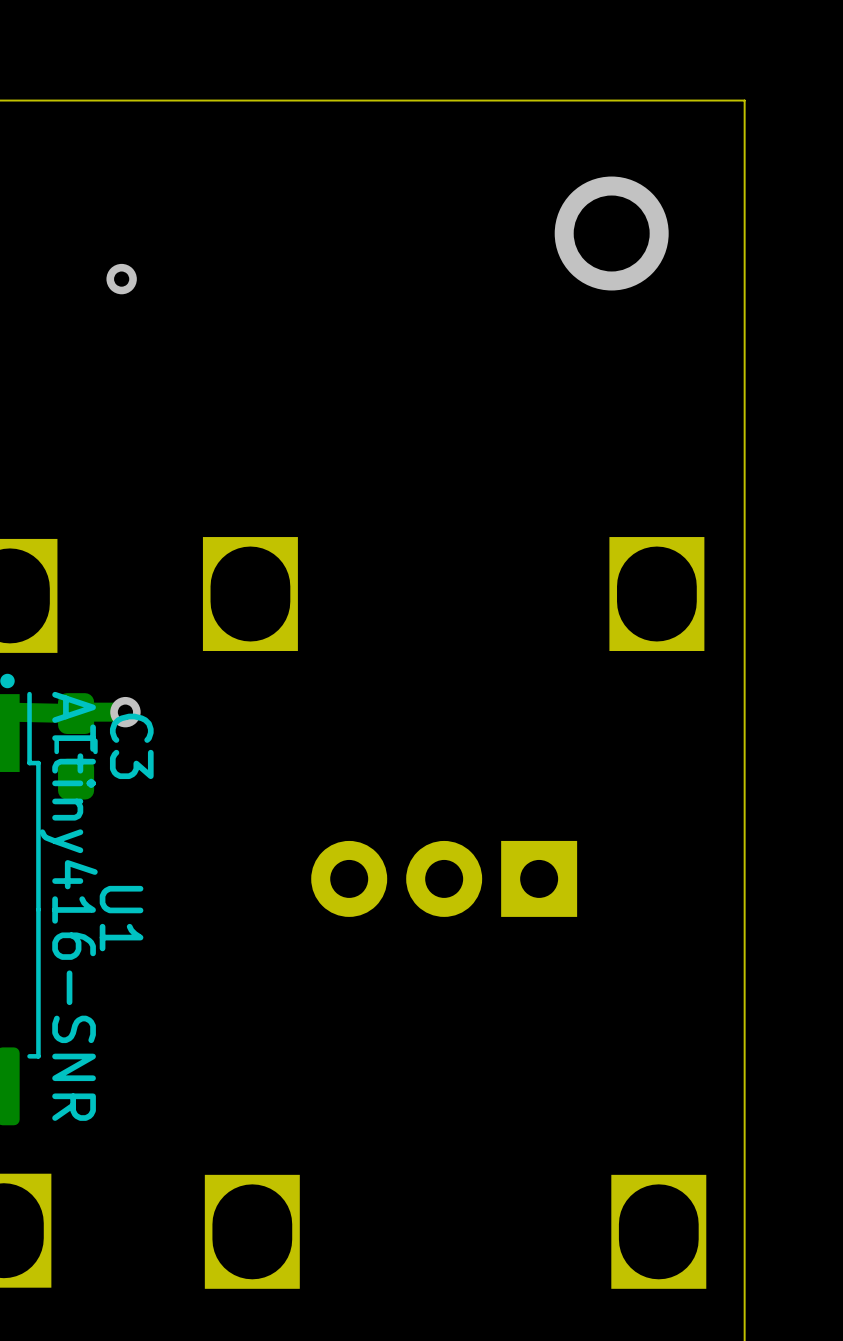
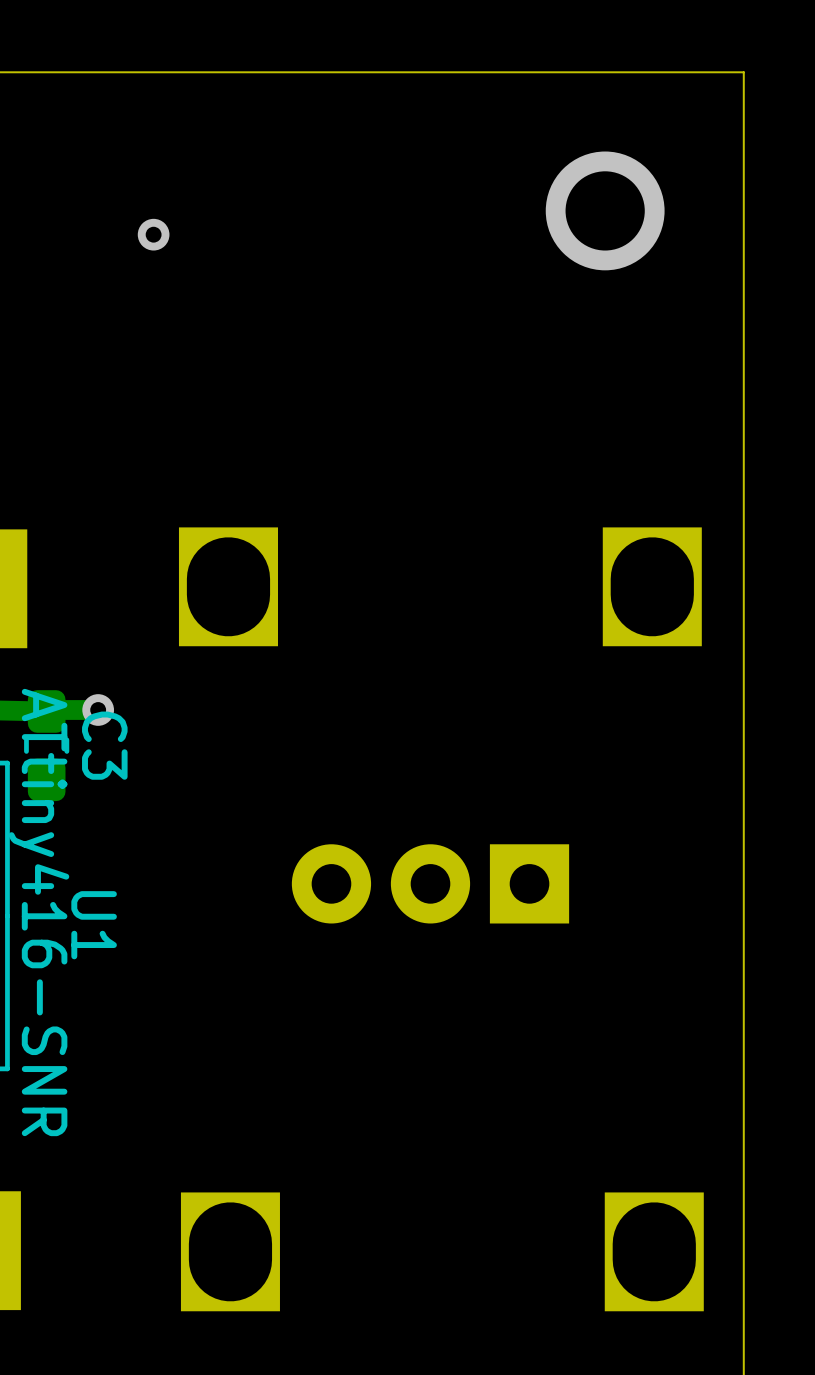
via position: (121, 279) -> (153, 234)

